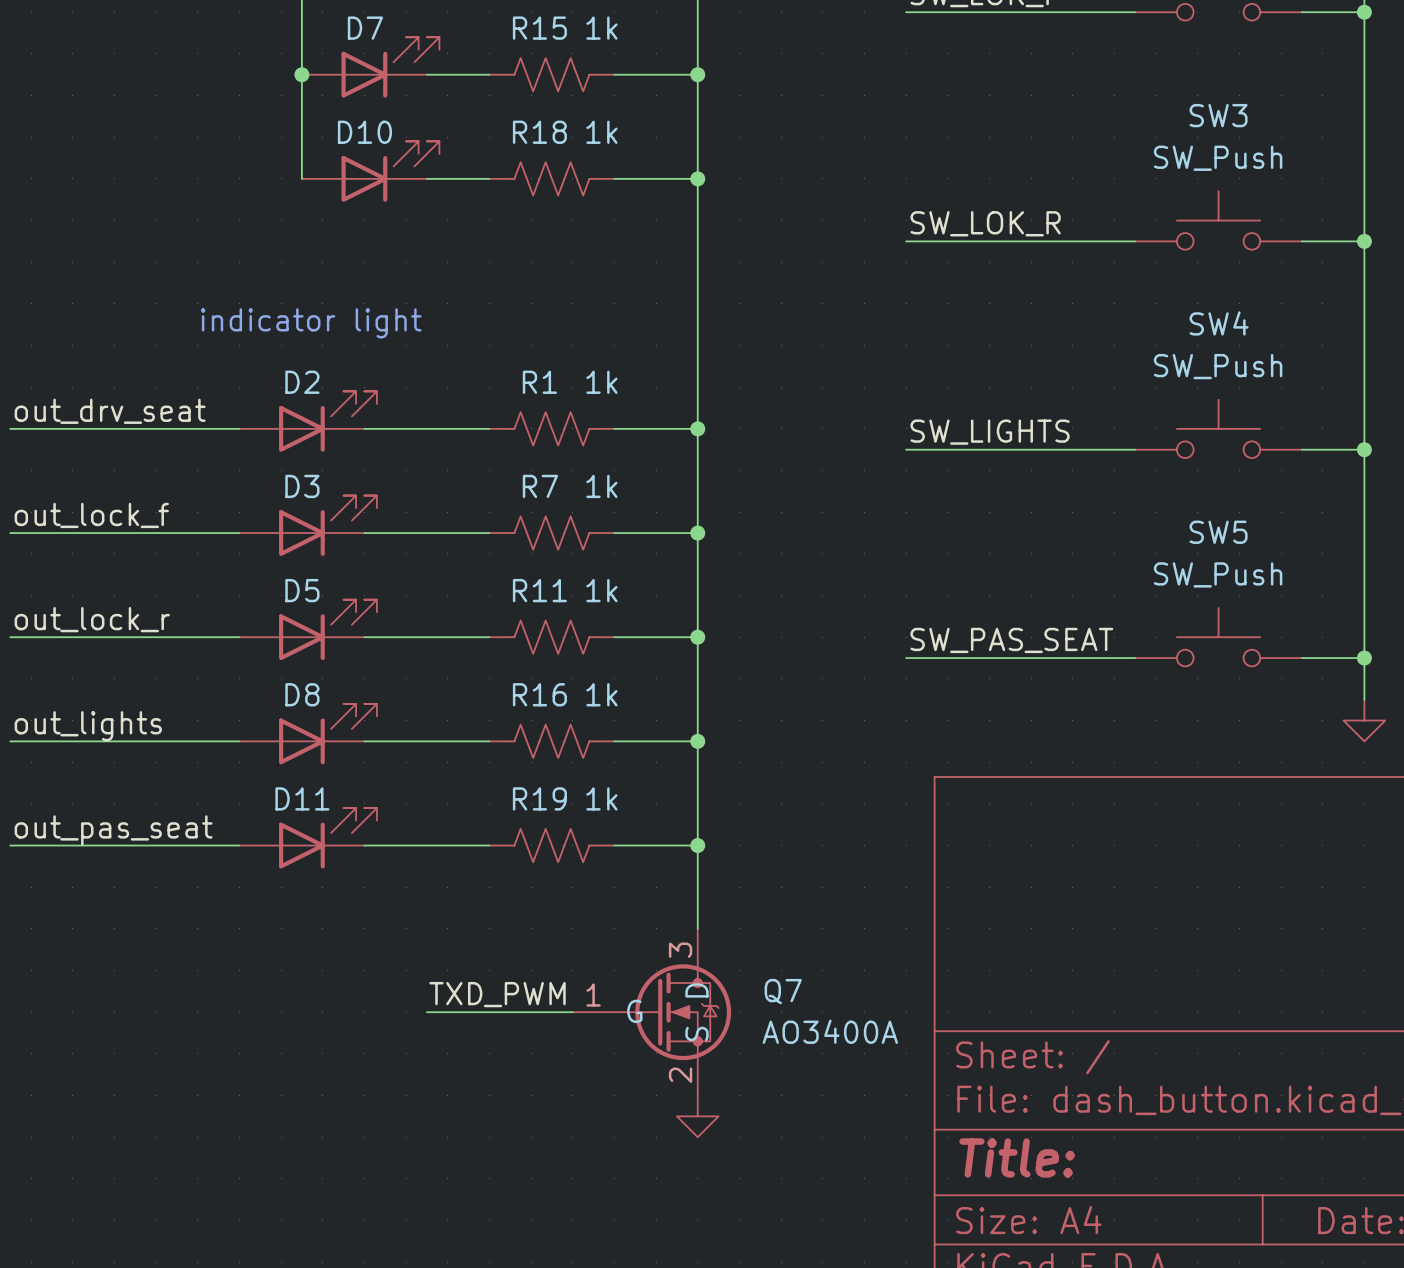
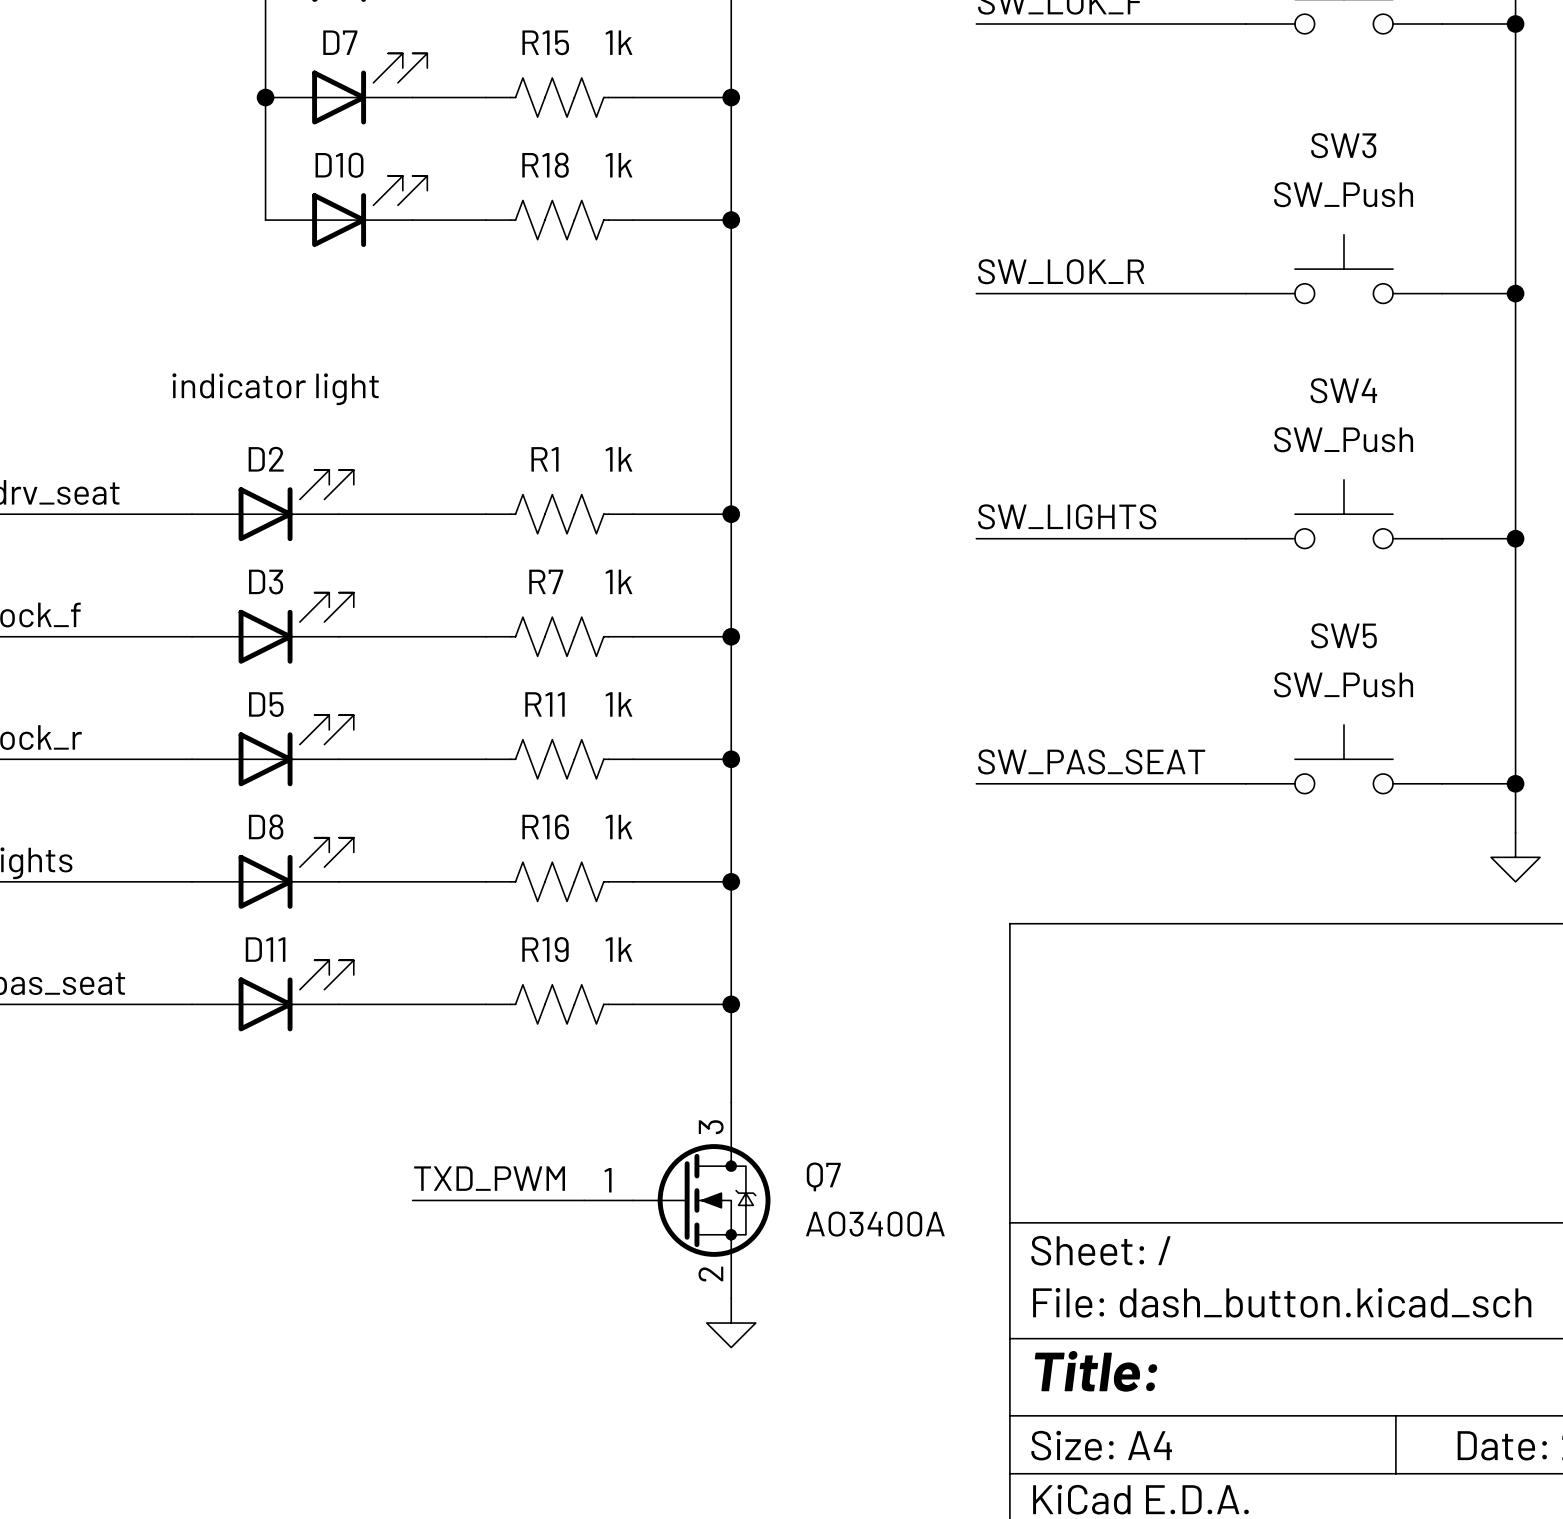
Q7 pin name: D (696, 990) -> none
Q7 pin name: G (634, 1011) -> none
Q7 pin name: S (696, 1033) -> none

